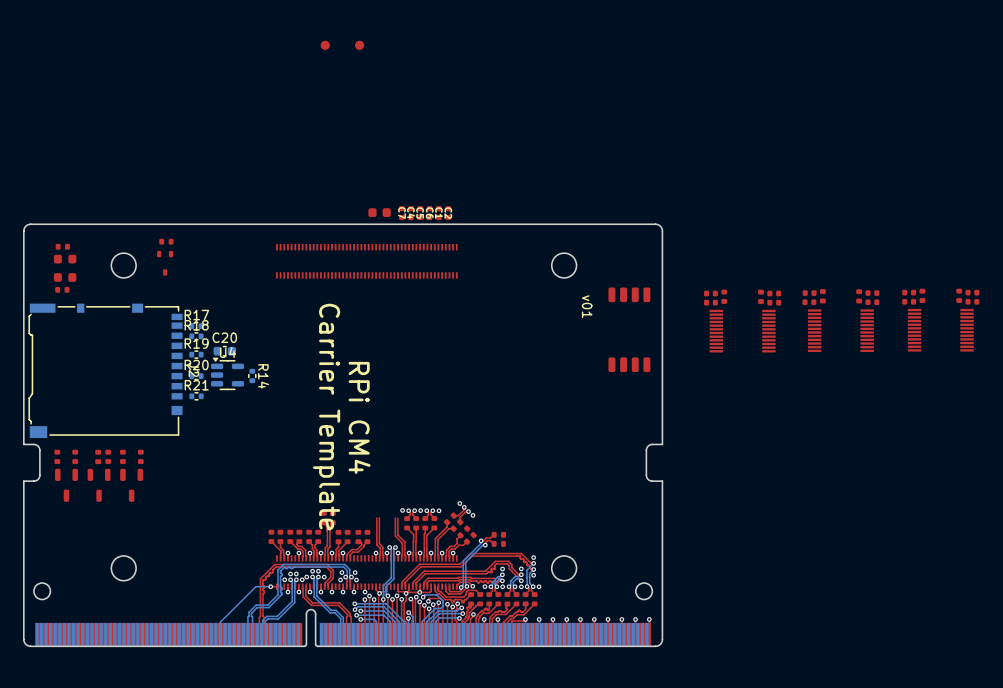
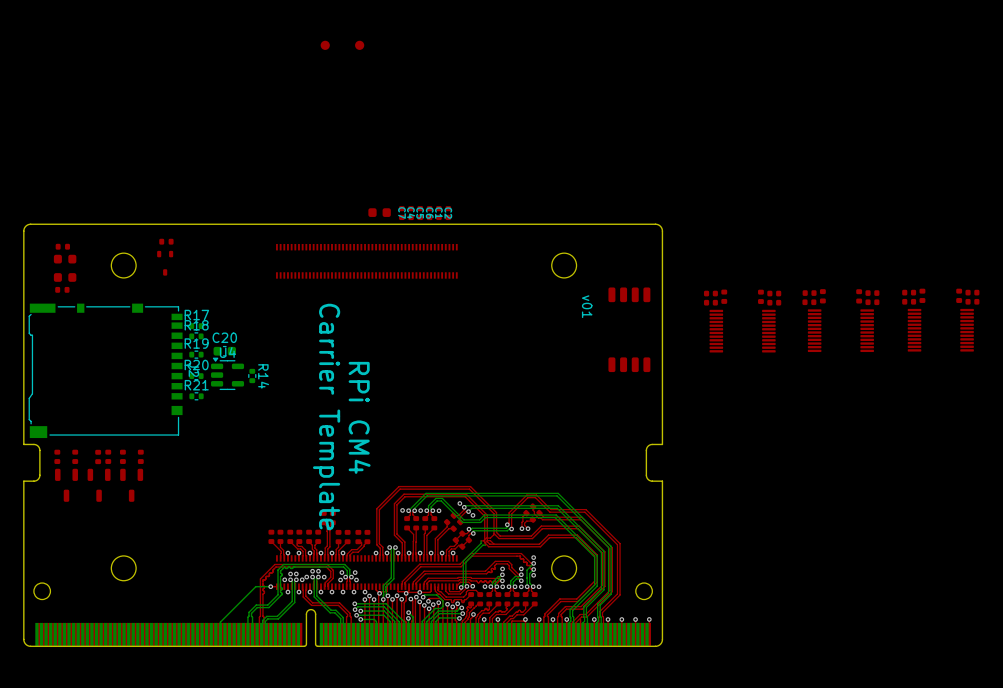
top track: none -> (533, 506) (534, 513) (542, 519) (580, 519) (609, 548) (609, 590) (585, 614) (580, 614) (572, 622) (571, 634)
bottom track: none -> (464, 507) (465, 505) (558, 505) (603, 551) (603, 589) (586, 607) (587, 634)
part: none -> (529, 509)
bottom track: none -> (408, 510) (425, 493) (558, 493) (611, 546) (611, 594) (600, 605) (601, 634)
bottom track: none -> (414, 510) (414, 508) (427, 495) (557, 495) (608, 547) (608, 593) (597, 604) (596, 634)
bottom track: none -> (426, 510) (435, 498) (442, 498) (463, 519) (479, 519) (484, 515) (556, 515) (597, 555) (597, 586) (572, 610) (573, 634)
bottom track: none -> (432, 510) (431, 506) (437, 500) (441, 500) (462, 522) (480, 522) (485, 517) (555, 517) (594, 557) (594, 585) (570, 609) (569, 634)
bottom track: none -> (468, 511) (471, 508) (557, 508) (601, 552) (601, 588) (583, 606) (582, 634)
top track: none -> (539, 512) (543, 517) (581, 517) (612, 547) (612, 591) (586, 617) (581, 617) (574, 623) (575, 634)
top track: none -> (526, 513) (522, 516) (521, 528)
part: none -> (536, 516)
top track: none -> (376, 517) (376, 508) (398, 486) (470, 486) (496, 512) (496, 532) (500, 536) (531, 536) (541, 526) (579, 526) (604, 551) (604, 586) (582, 609) (566, 609) (561, 614) (562, 634)
top track: none -> (379, 517) (379, 509) (400, 489) (469, 489) (493, 513) (493, 533) (499, 538) (532, 538) (542, 528) (578, 528) (602, 552) (602, 585) (581, 606) (565, 606) (558, 613) (557, 634)
top track: (395, 518) (395, 536) -> (548, 634) (547, 615) (560, 601) (577, 601) (597, 582) (597, 554) (577, 535) (548, 535) (539, 544) (489, 544) (487, 541) (487, 515) (466, 494) (403, 494) (394, 503) (395, 536)
top track: (397, 518) (397, 535) -> (543, 634) (544, 614) (559, 598) (576, 598) (594, 581) (594, 555) (576, 537) (549, 537) (540, 546) (488, 546) (484, 542) (484, 516) (465, 496) (405, 496) (396, 504) (397, 535)
top track: none -> (532, 519) (524, 523) (528, 528)
top track: none -> (507, 524) (509, 512) (526, 495) (536, 495) (551, 509) (585, 509) (620, 543) (620, 595) (602, 612) (603, 634)
bottom track: none -> (507, 524) (506, 528) (469, 529)
via: none -> (507, 524)
via: none -> (521, 528)
via: none -> (528, 528)
top track: none -> (469, 529) (467, 533) (462, 533)
via: none -> (469, 529)
top track: none -> (511, 529) (511, 513) (527, 497) (535, 497) (549, 512) (584, 512) (617, 544) (617, 593) (599, 611) (598, 634)
bottom track: none -> (511, 529) (507, 530) (473, 530) (473, 533)
via: none -> (511, 529)
part: (463, 532) -> none
top track: none -> (473, 533) (468, 535) (468, 540)
via: none -> (473, 533)
part: (498, 534) -> none
part: none -> (459, 536)
part: (470, 538) -> none
via: (481, 540) -> none
part: none -> (465, 543)
part: (498, 543) -> none
via: (485, 545) -> none
via: (580, 619) -> none

